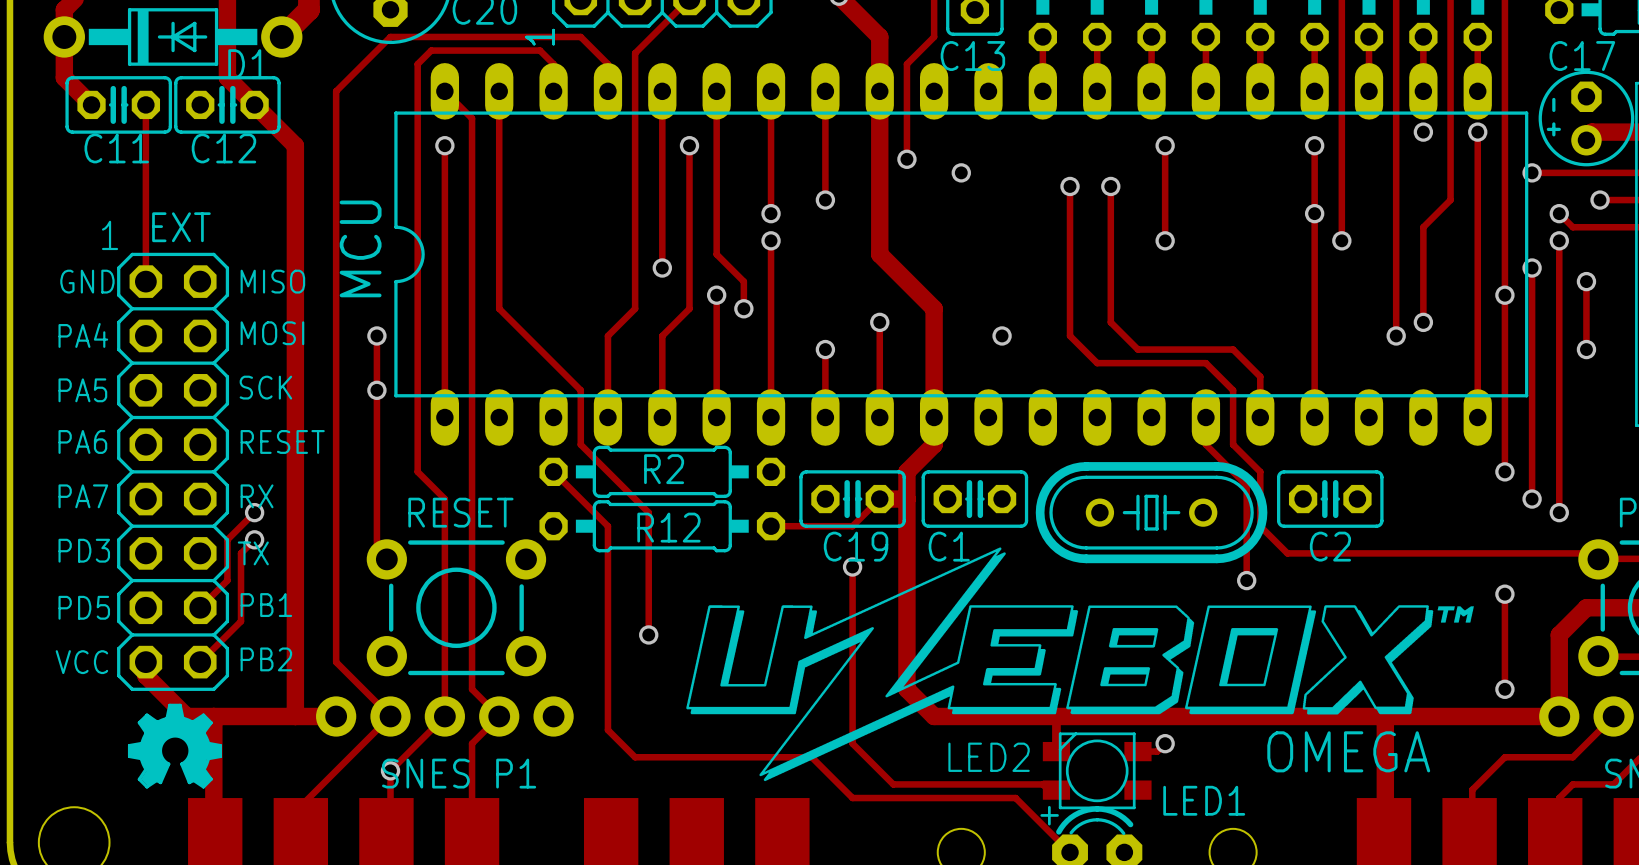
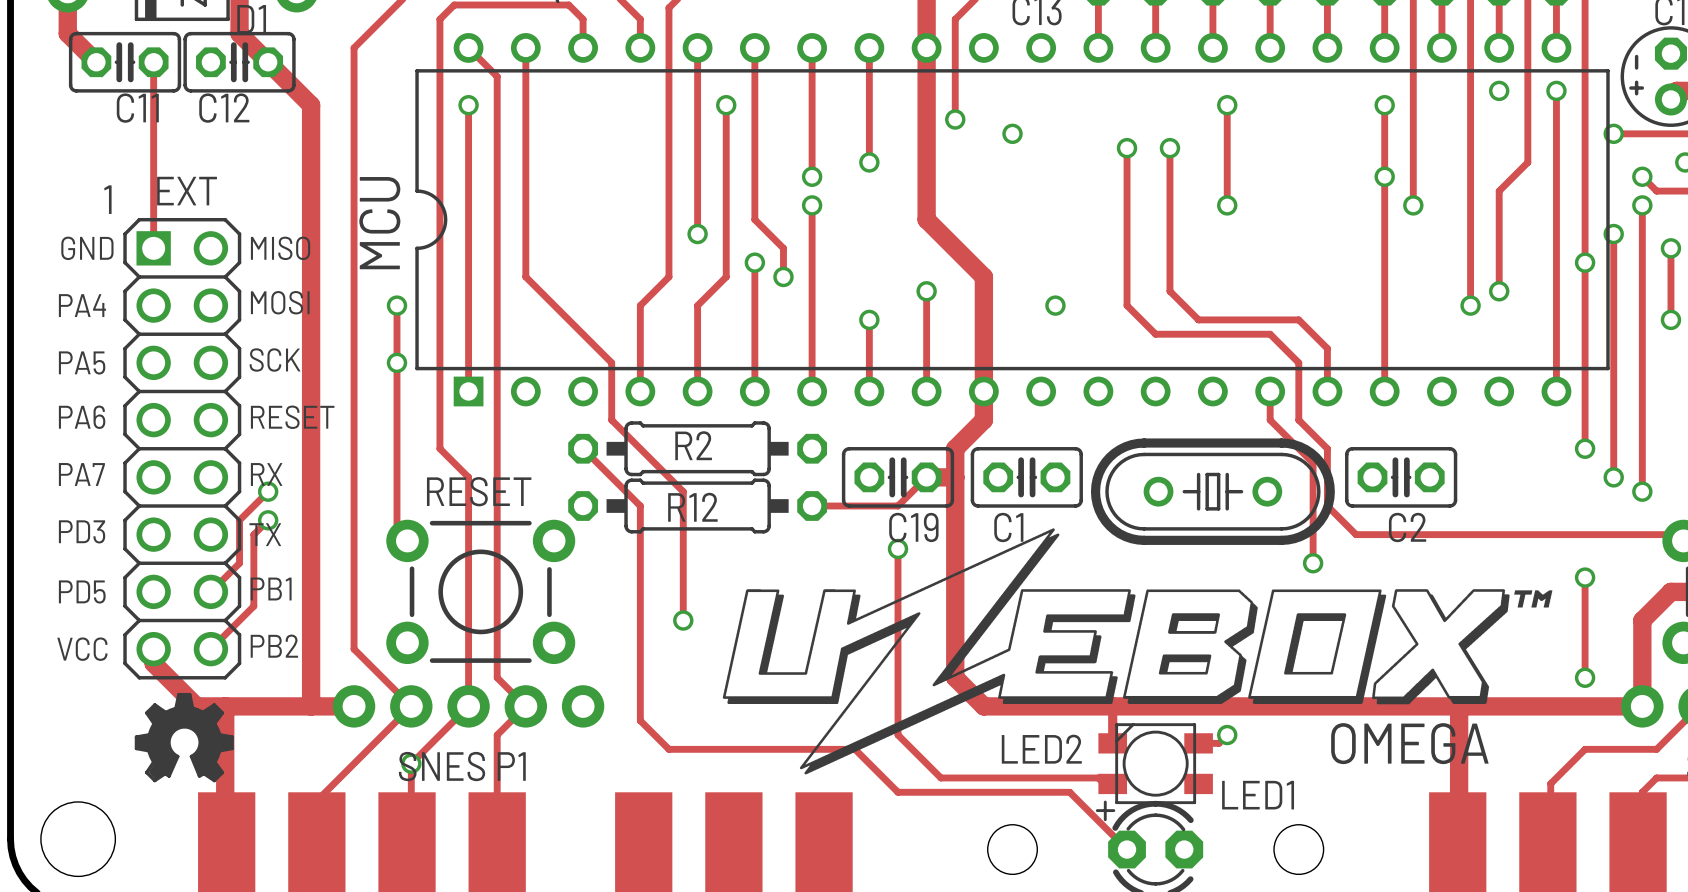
MCU footprint: [394, 63, 1529, 446] -> [415, 33, 1610, 407]
EXT footprint: [117, 252, 230, 691] -> [123, 217, 242, 680]

